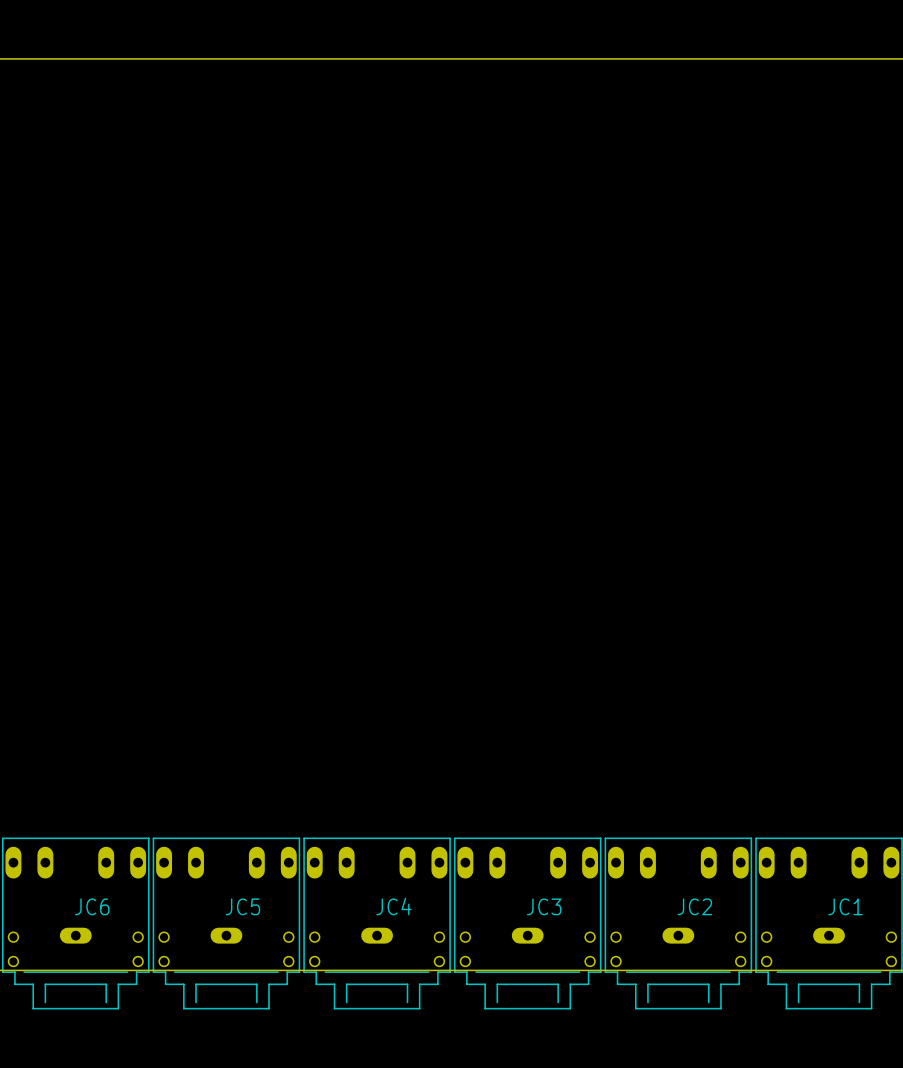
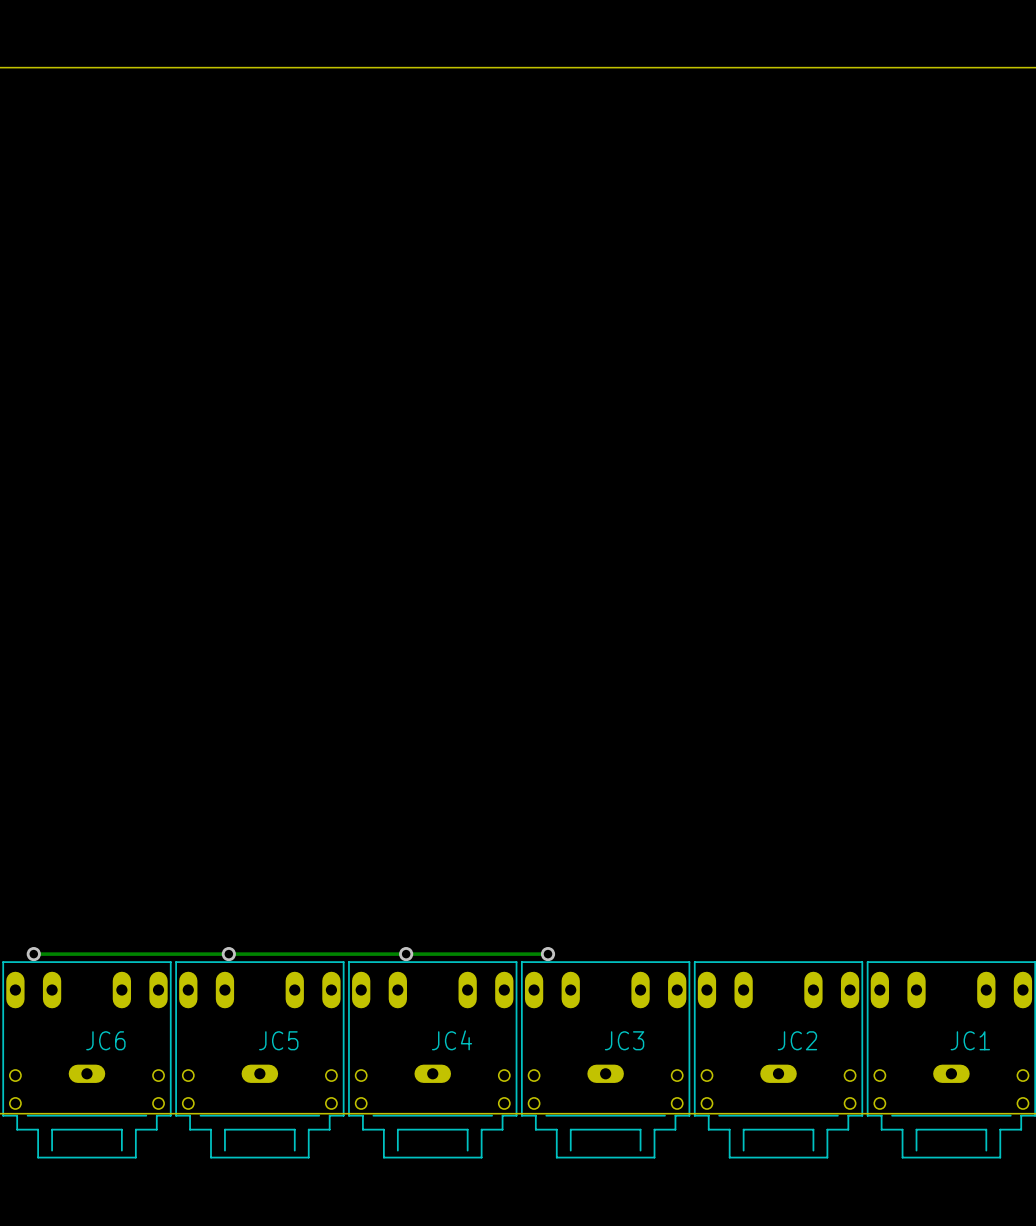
via: none -> (33, 954)
via: none -> (228, 954)
via: none -> (406, 954)
track: none -> (548, 954) (33, 954)
via: none -> (548, 954)

